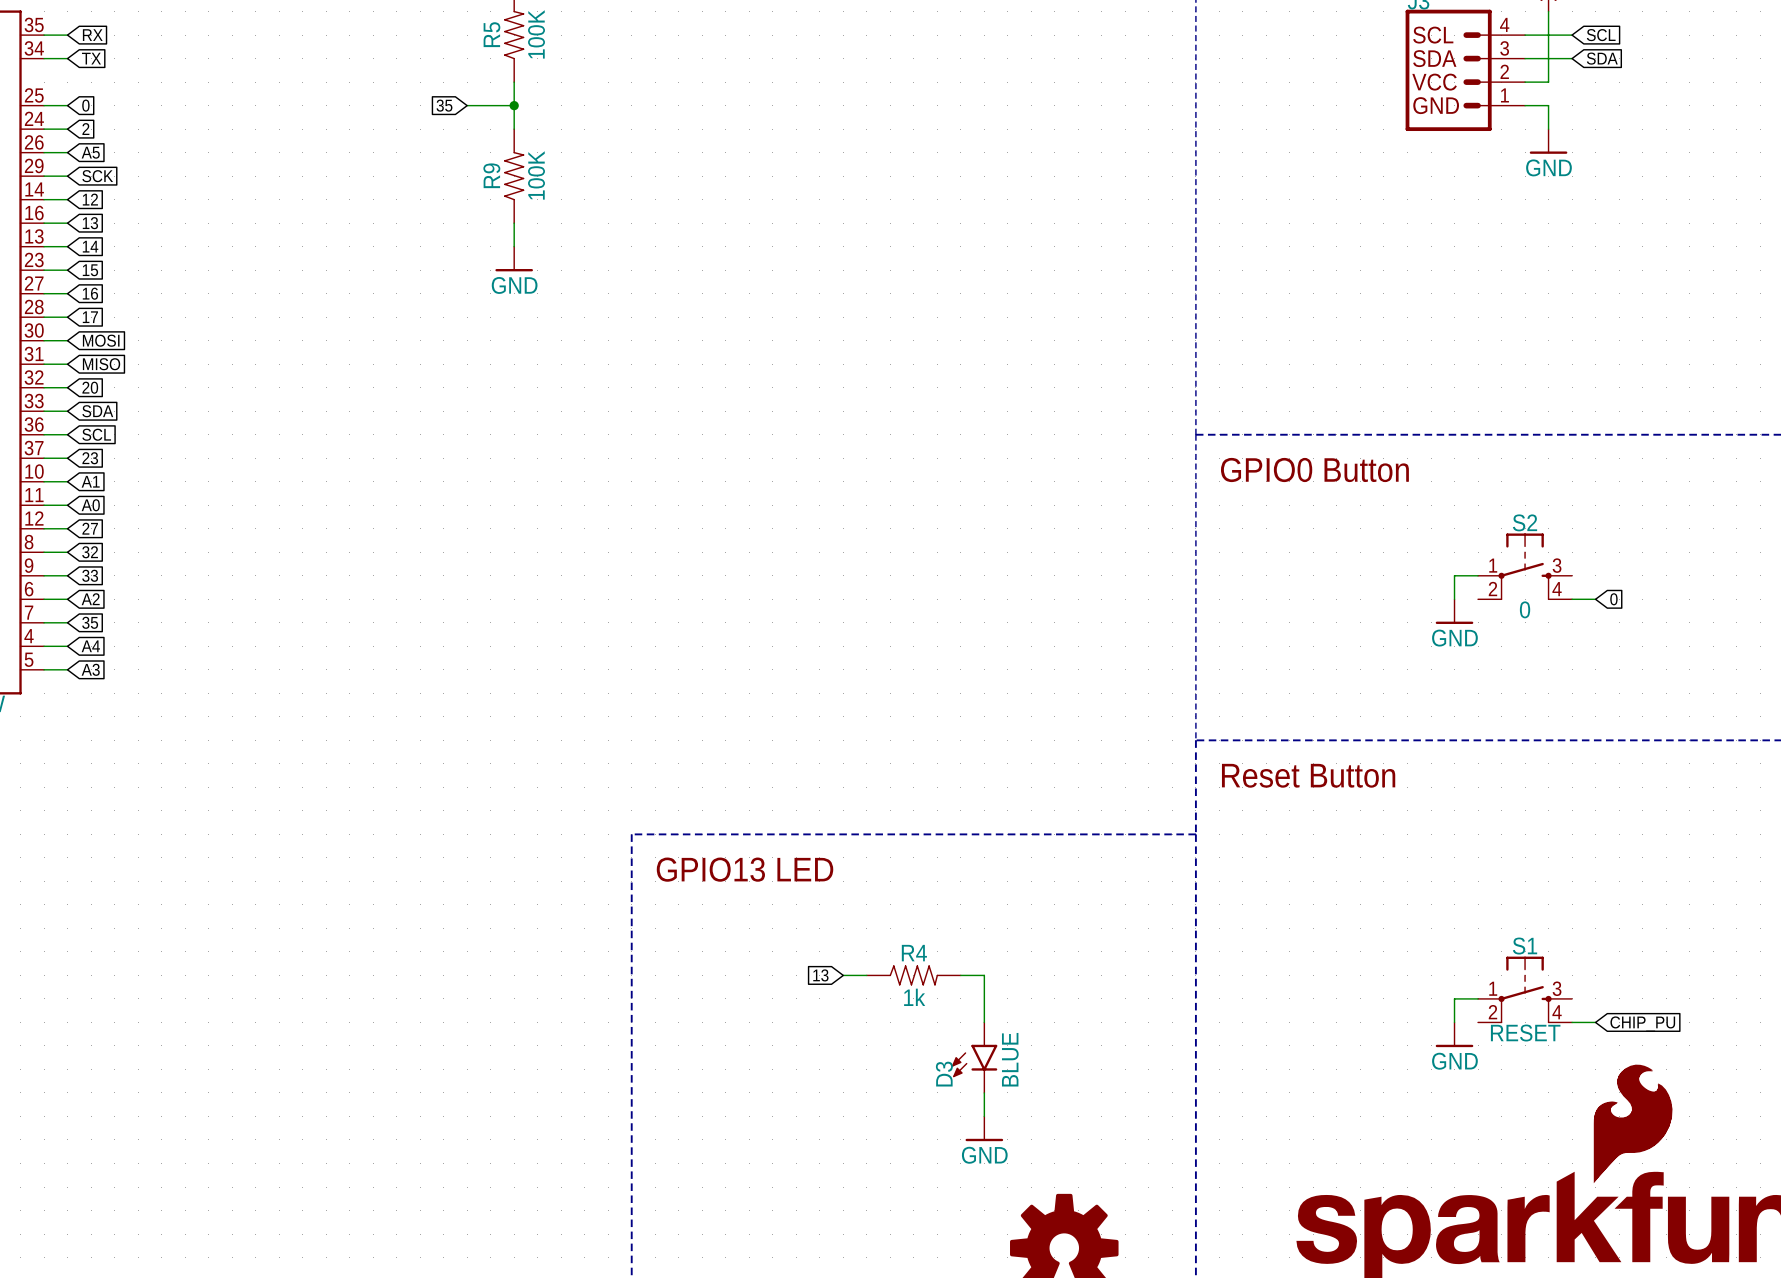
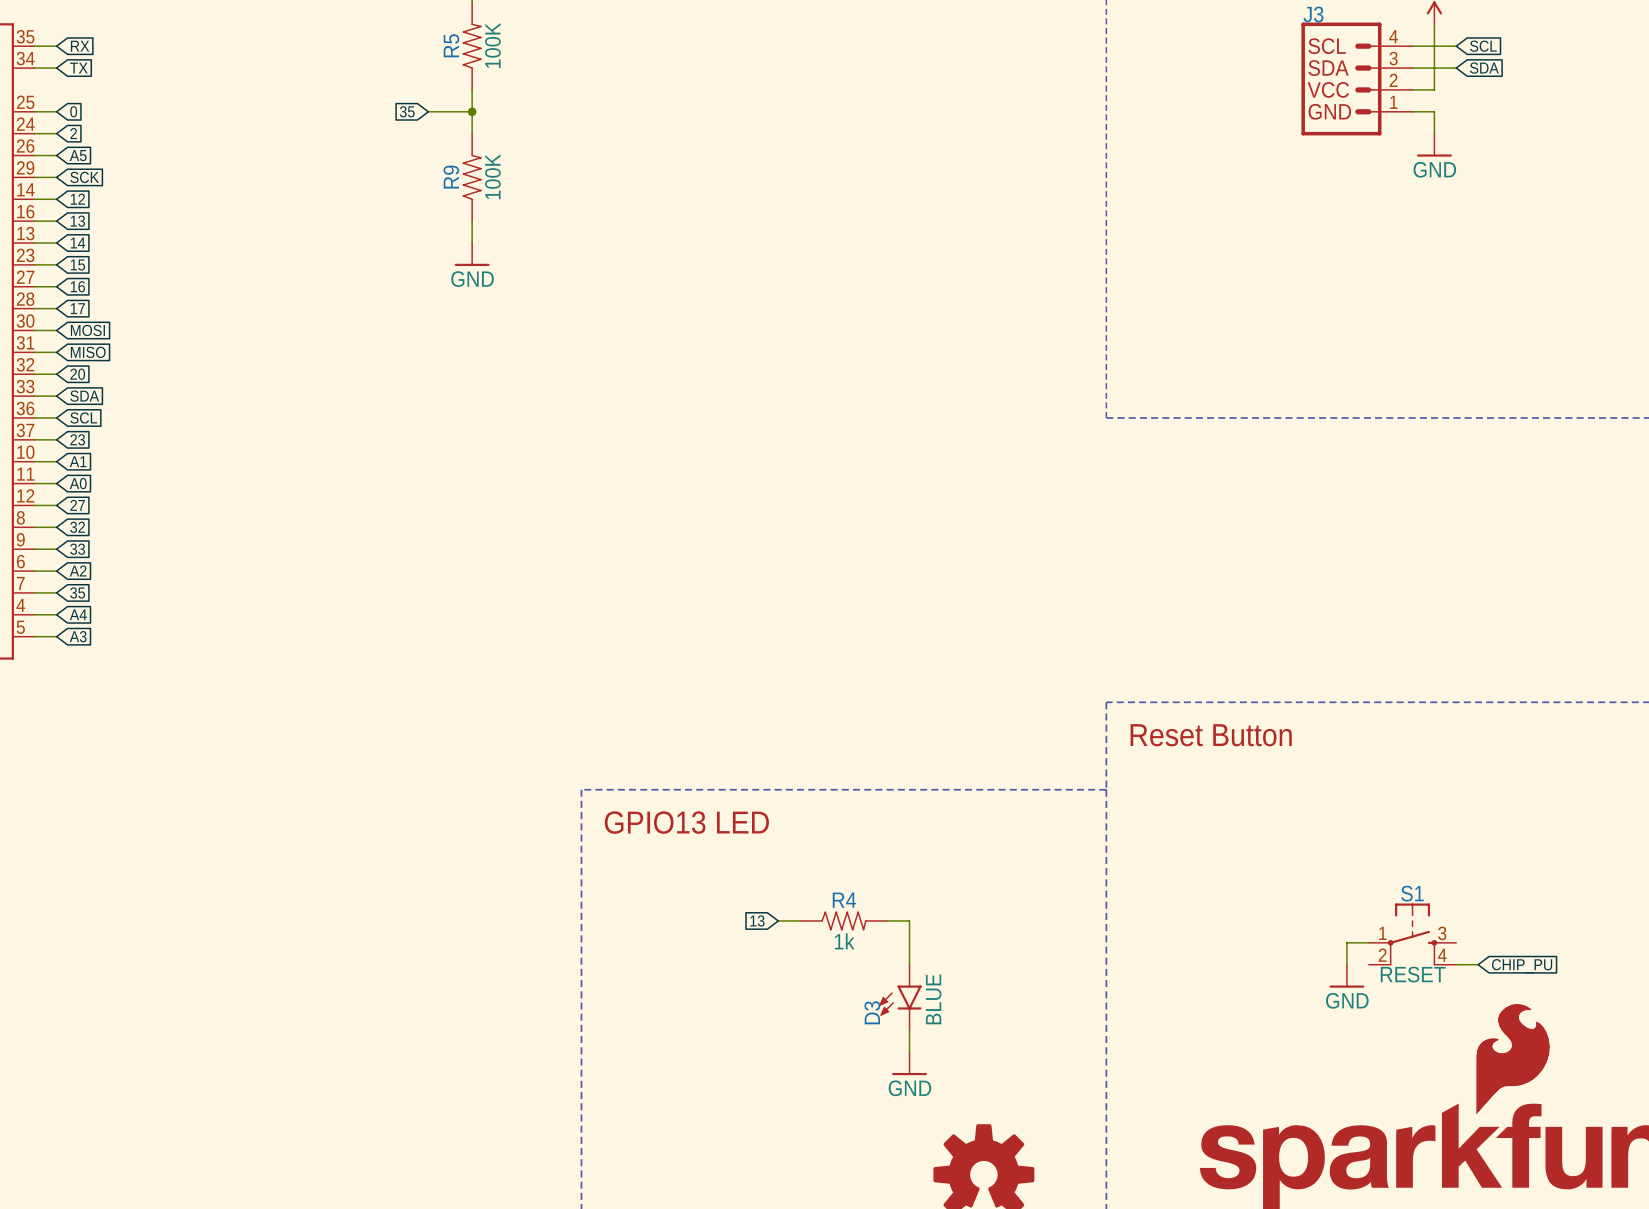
line: (1195, 434) (1195, 740) -> none
text: GPIO0 Button (1314, 469) -> none
S2: 0 (1525, 566) -> none
wire: (1478, 575) (1454, 575) (1454, 599) -> none
wire: (1572, 599) (1595, 599) -> none
global label: 0 (1613, 599) -> none
power symbol: GND (1454, 611) -> none

